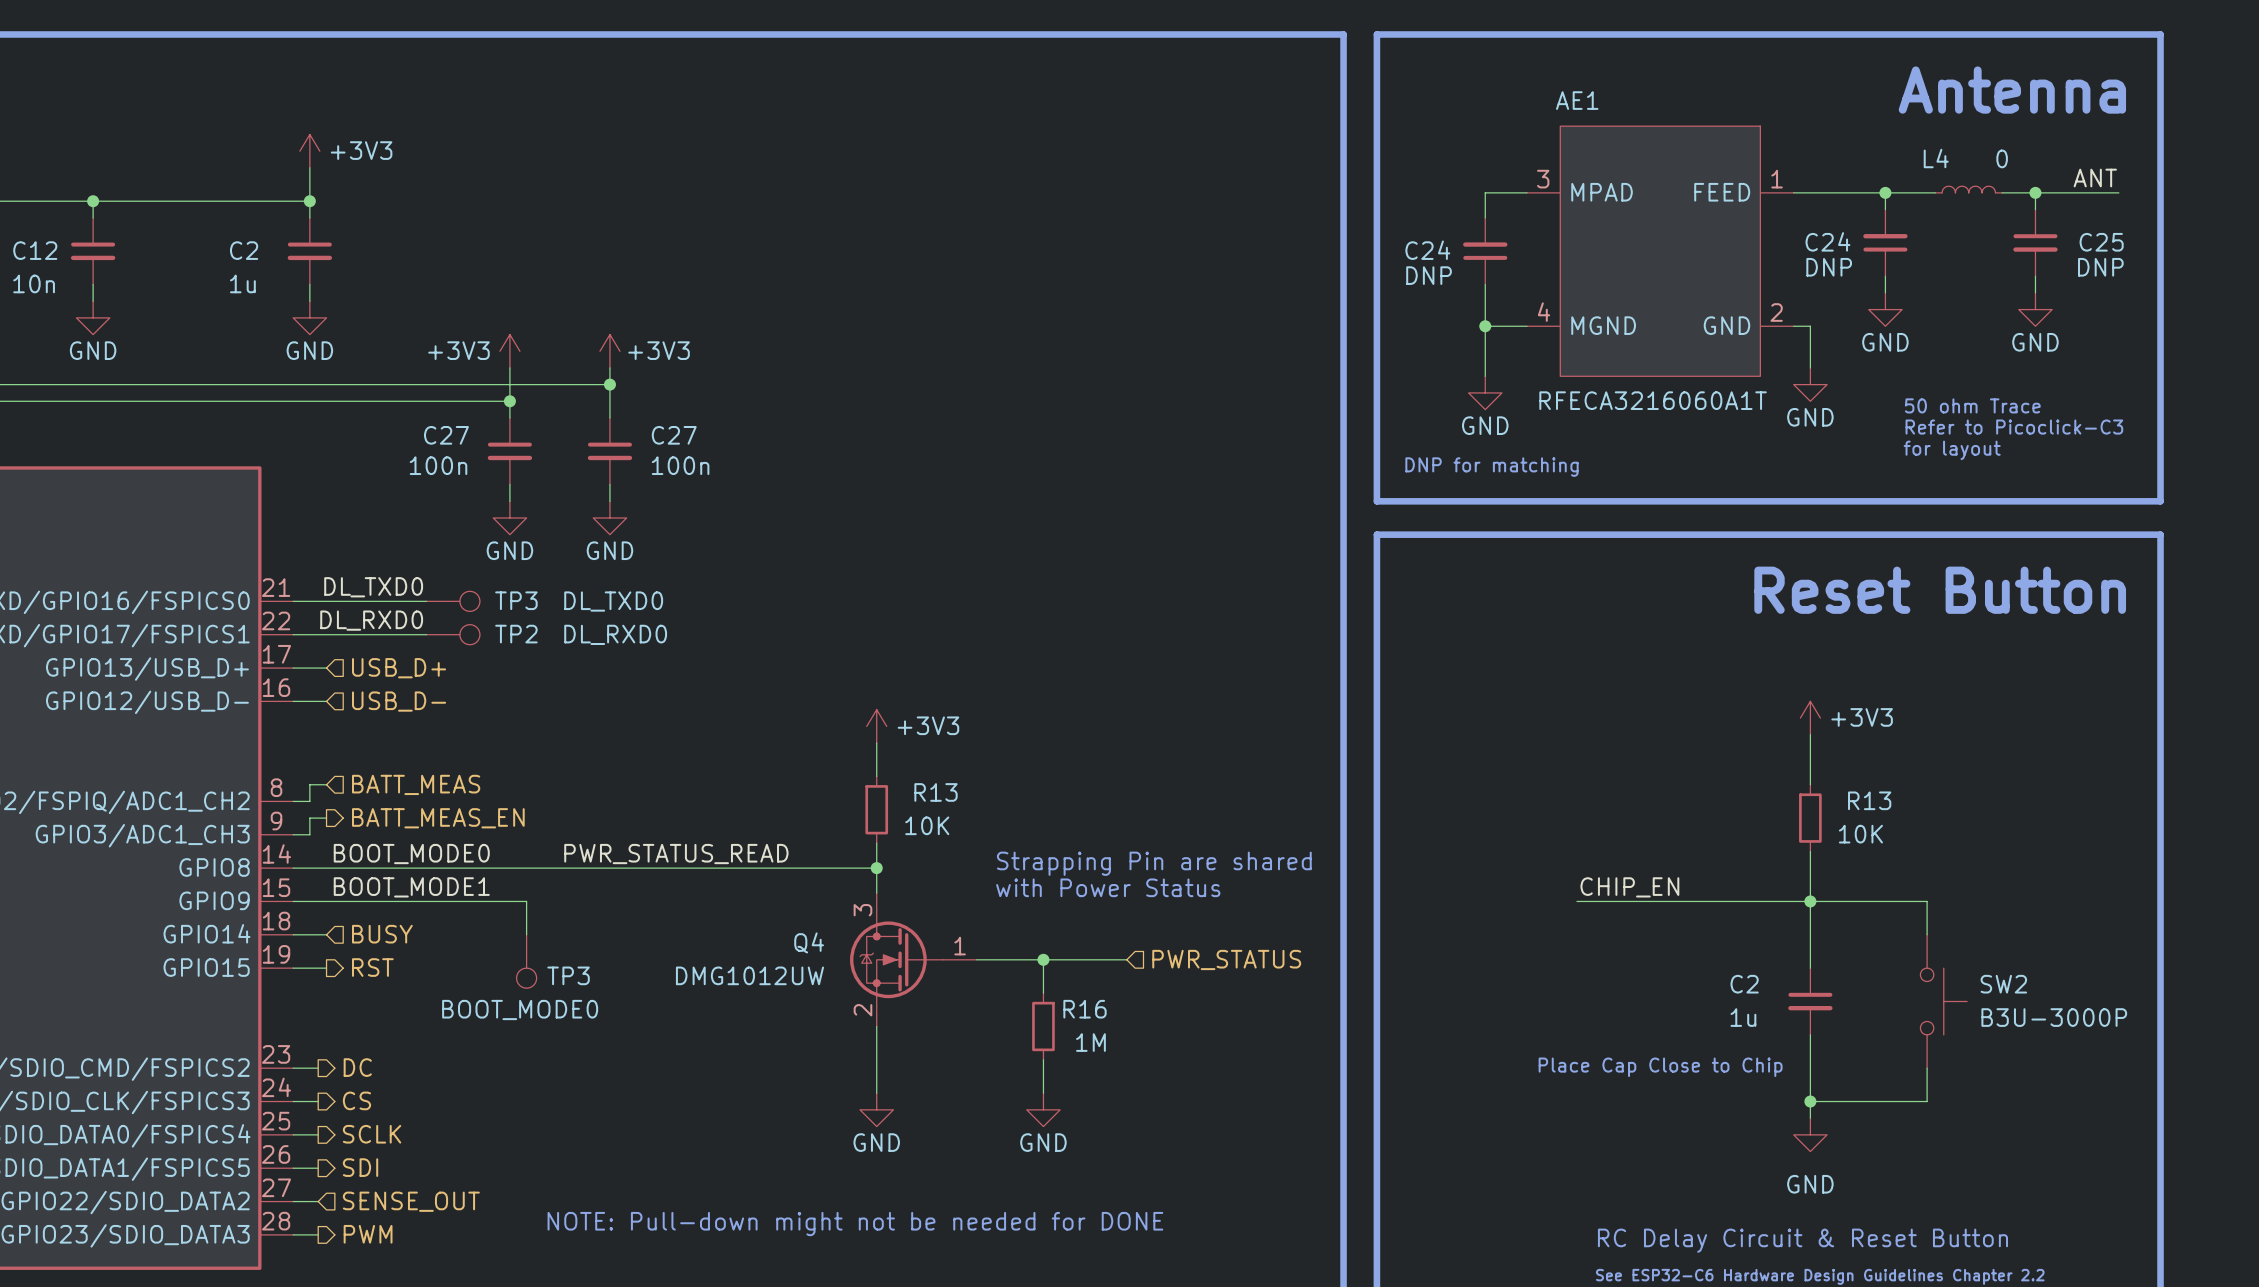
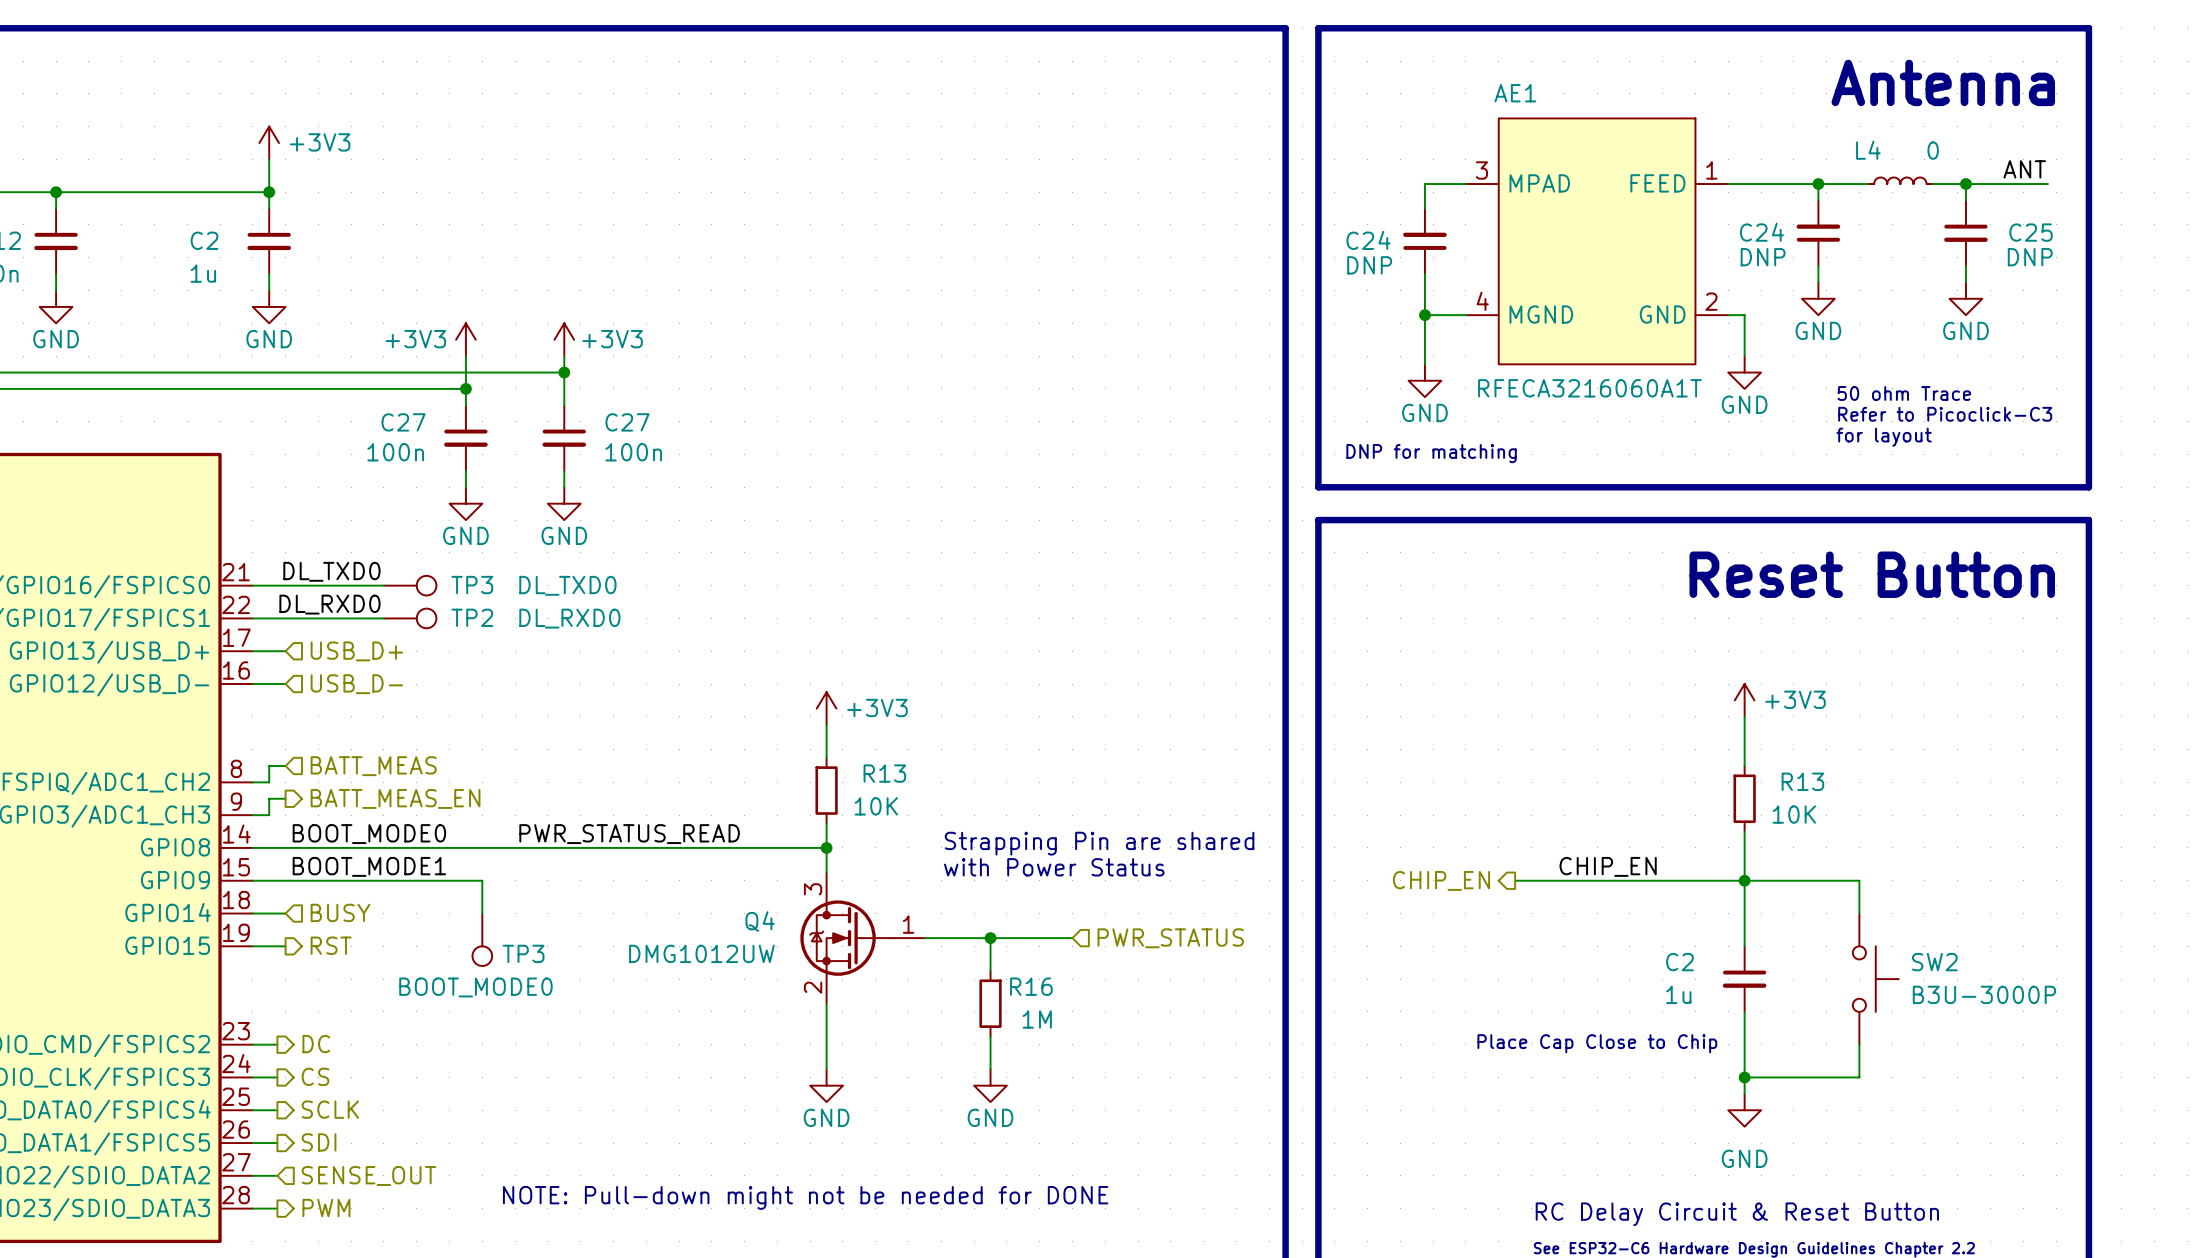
label position: CHIP_EN (1629, 887) -> CHIP_EN (1608, 866)
hierarchical label: none -> CHIP_EN (1441, 880)

